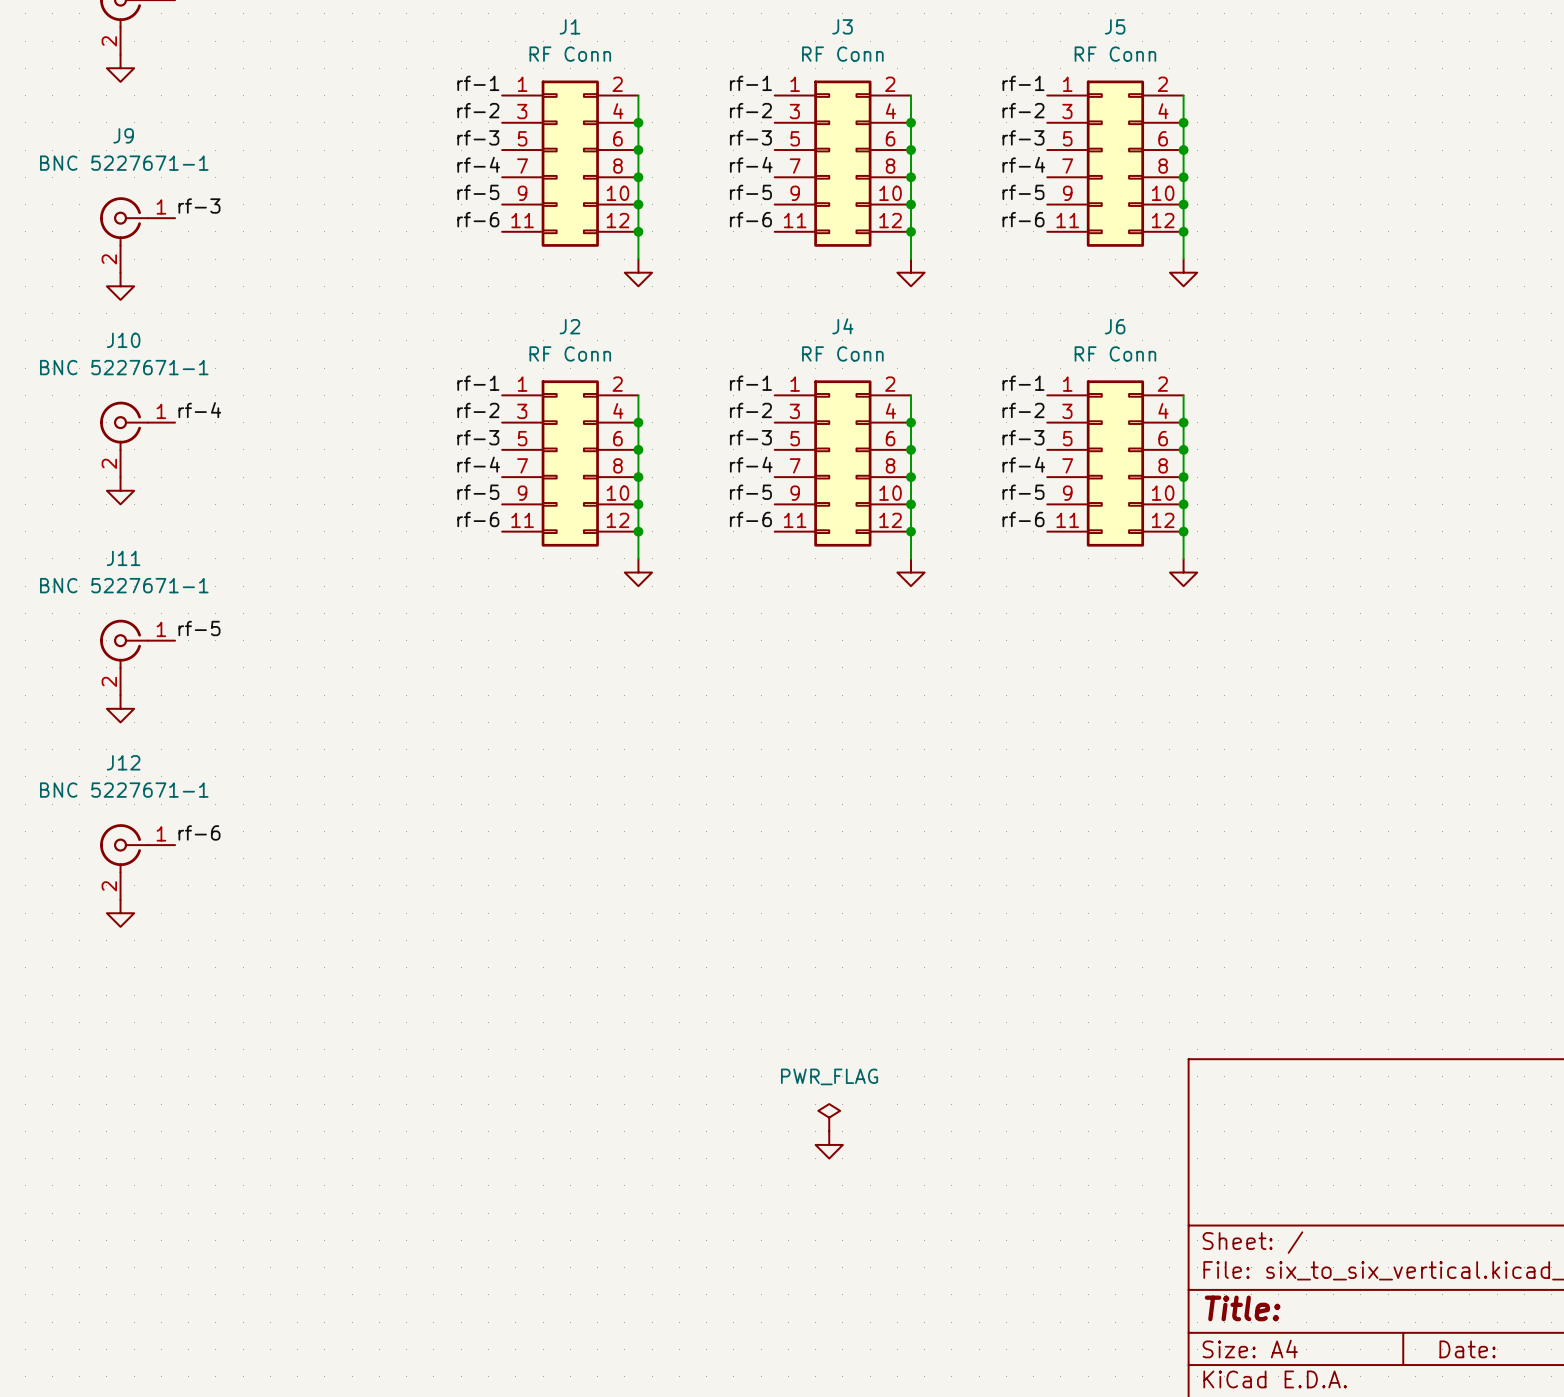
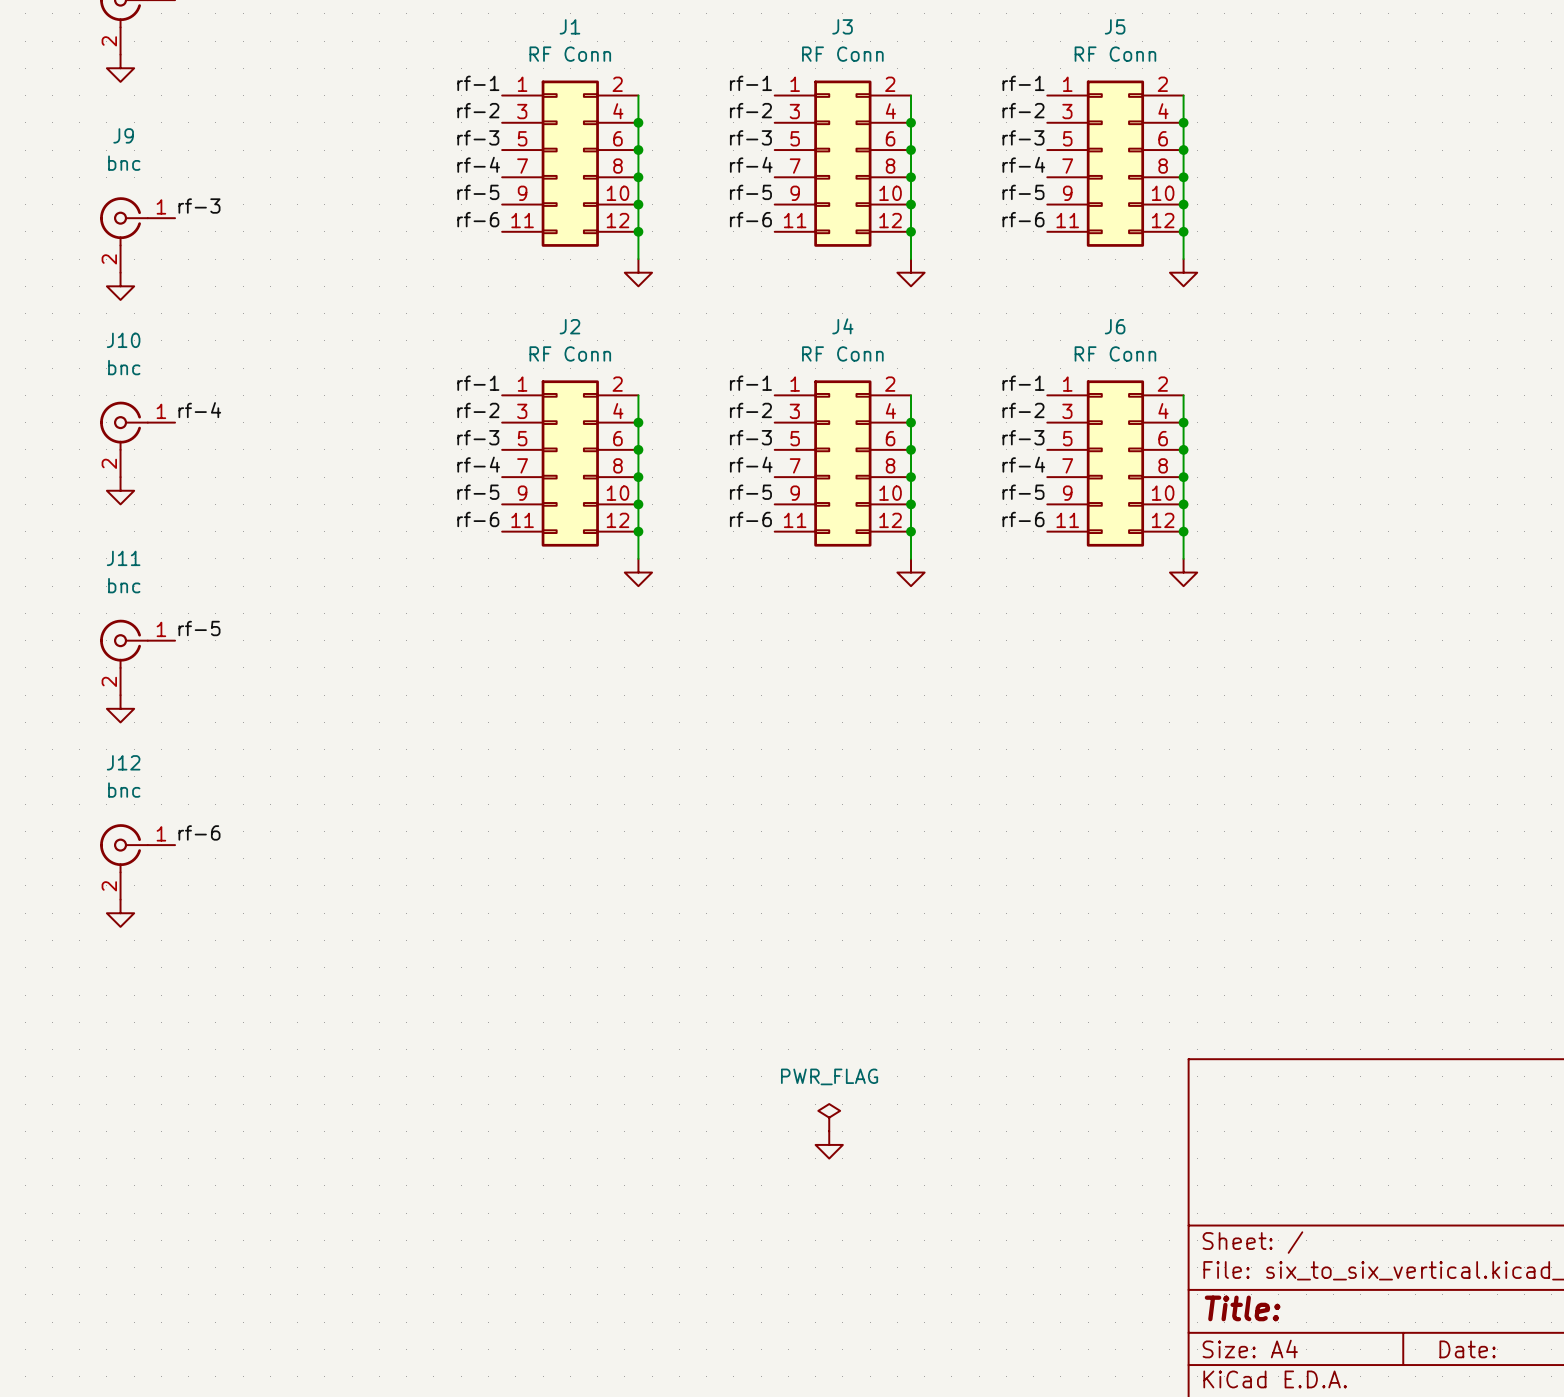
J9 value: BNC 5227671-1 (124, 163) -> bnc (124, 163)
J10 value: BNC 5227671-1 (124, 367) -> bnc (124, 367)
J11 value: BNC 5227671-1 (124, 585) -> bnc (124, 585)
J12 value: BNC 5227671-1 (124, 790) -> bnc (124, 790)

